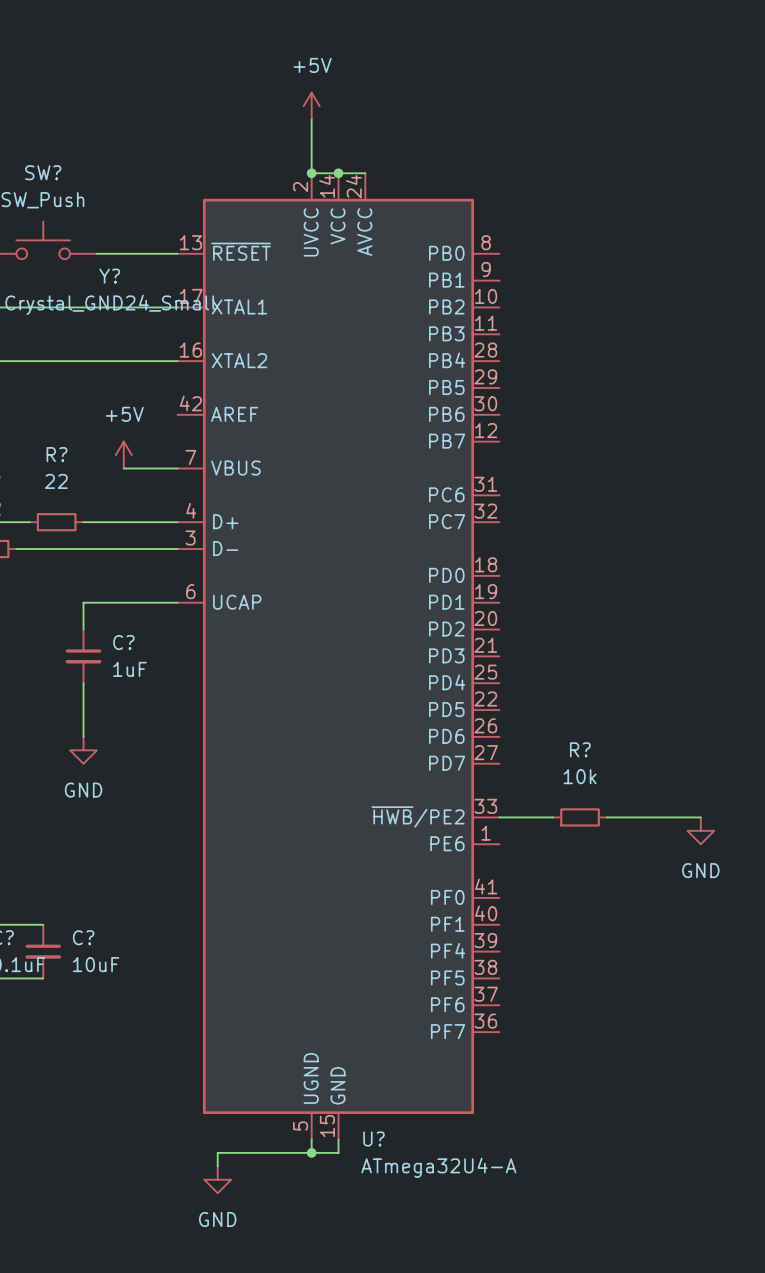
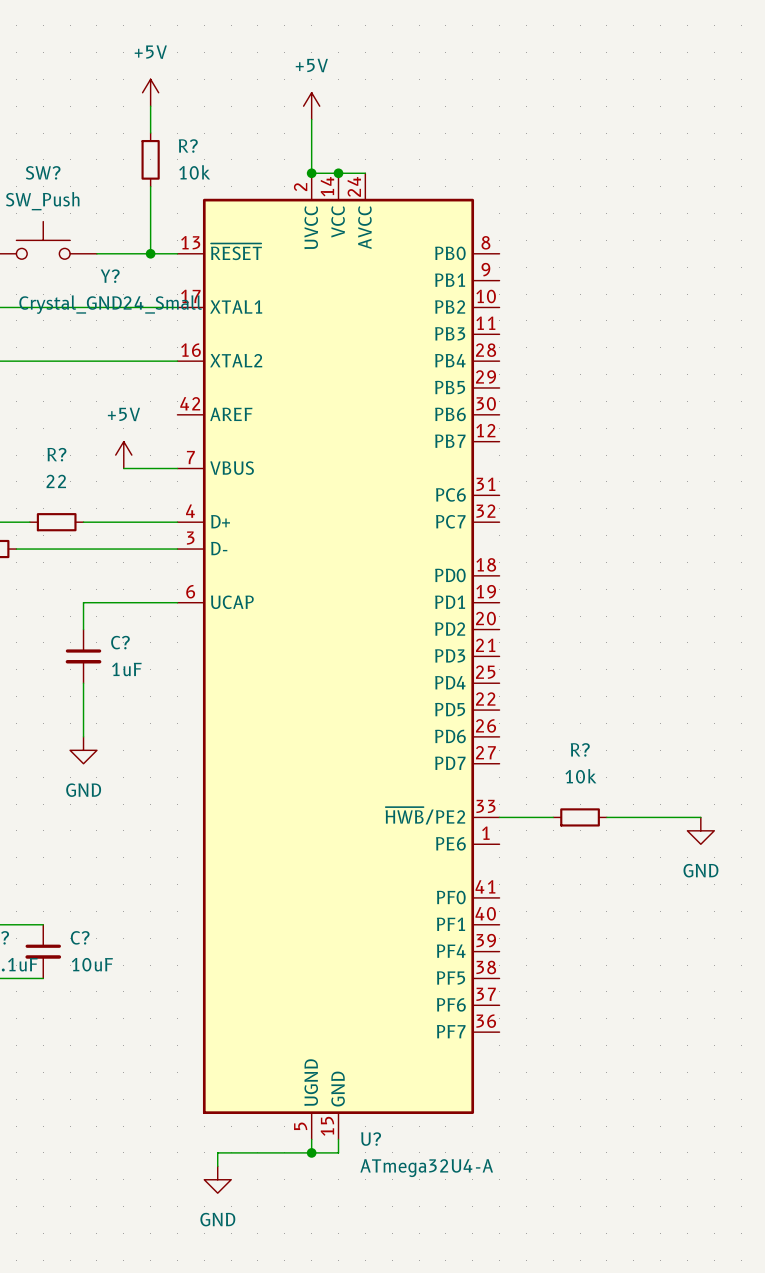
power symbol: none -> +5V (150, 92)
wire: none -> (150, 106) (150, 133)
R?: none -> 10k (150, 159)
wire: none -> (150, 186) (150, 253)
junction: none -> (150, 253)

